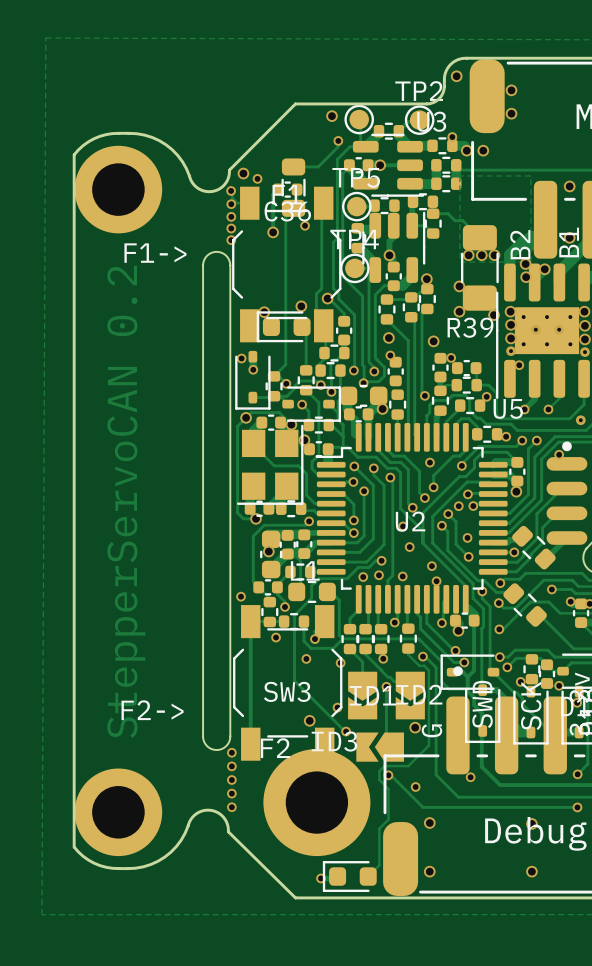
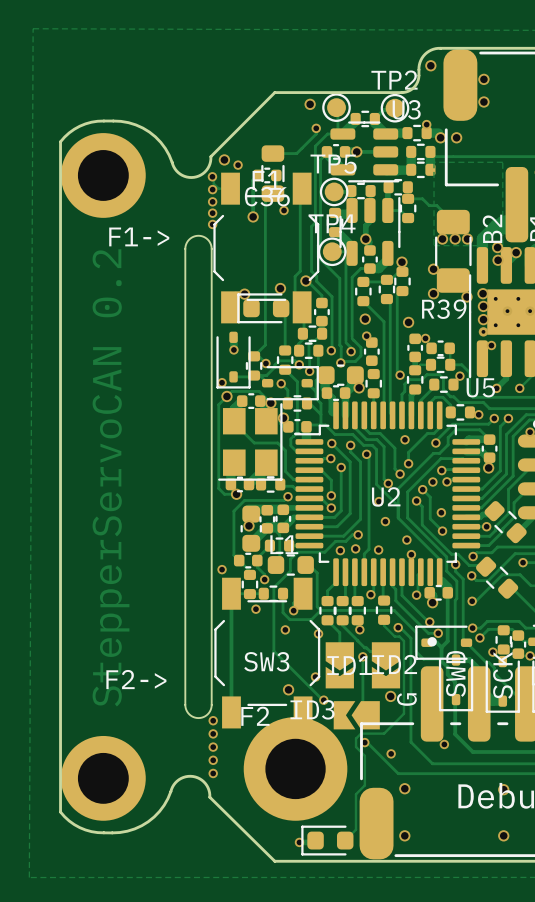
via position: (241, 358) -> (222, 382)

